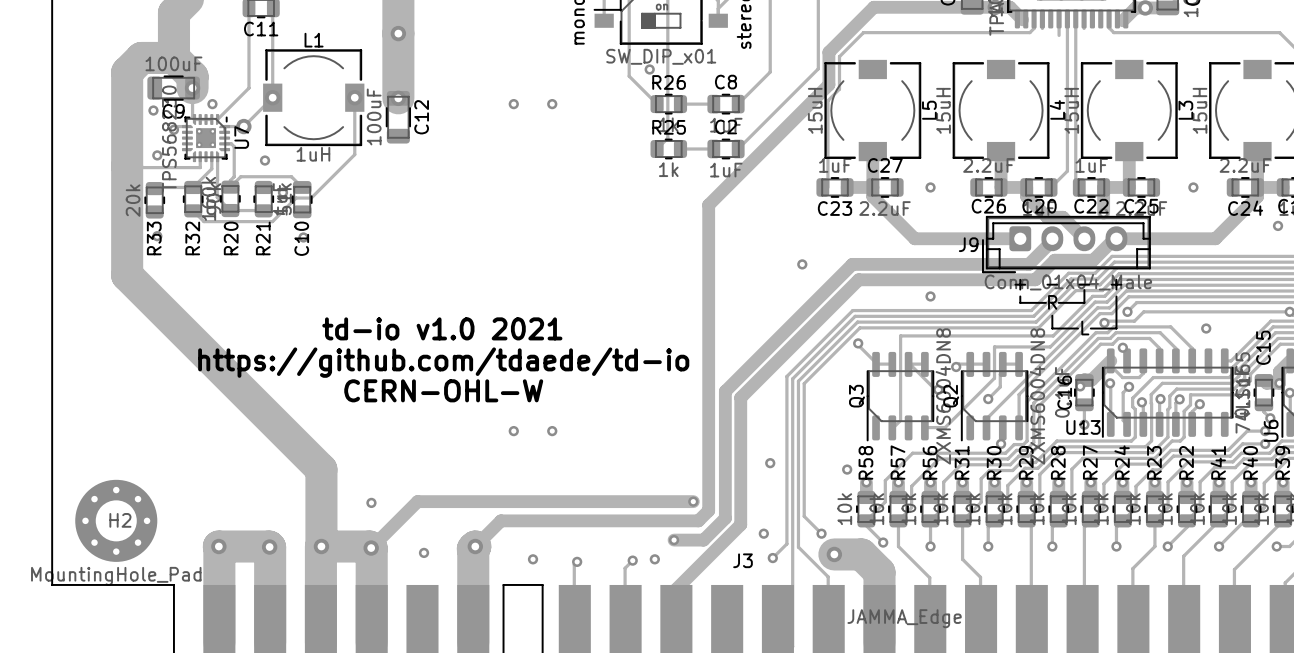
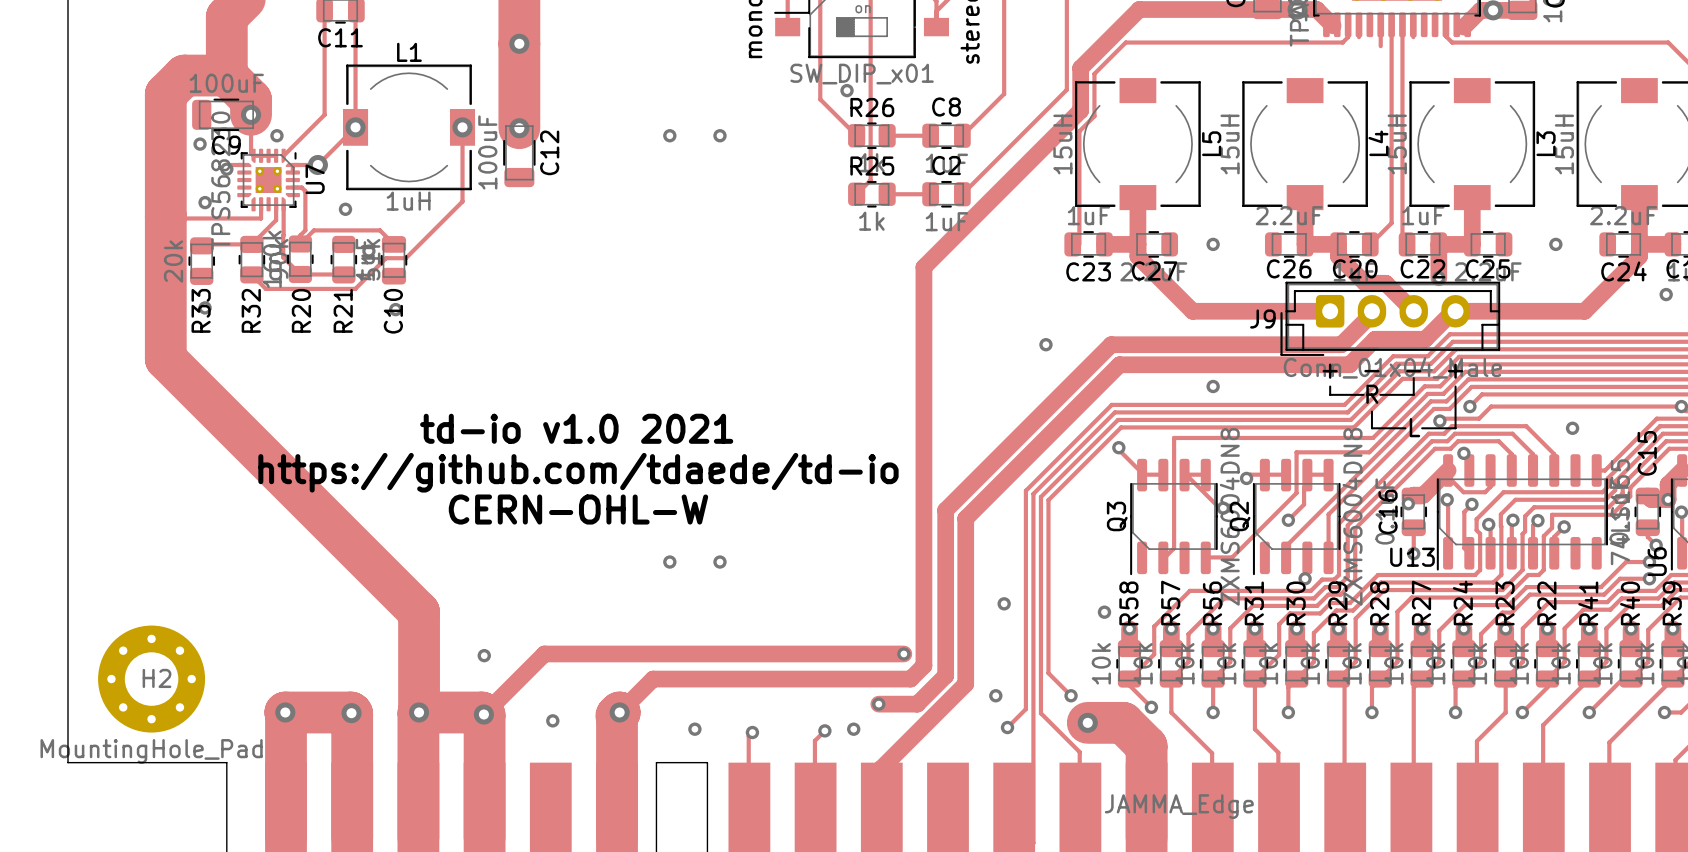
C27 name position: C27 (885, 165) -> C27 (1154, 270)
J3 name: J3 (743, 560) -> none

